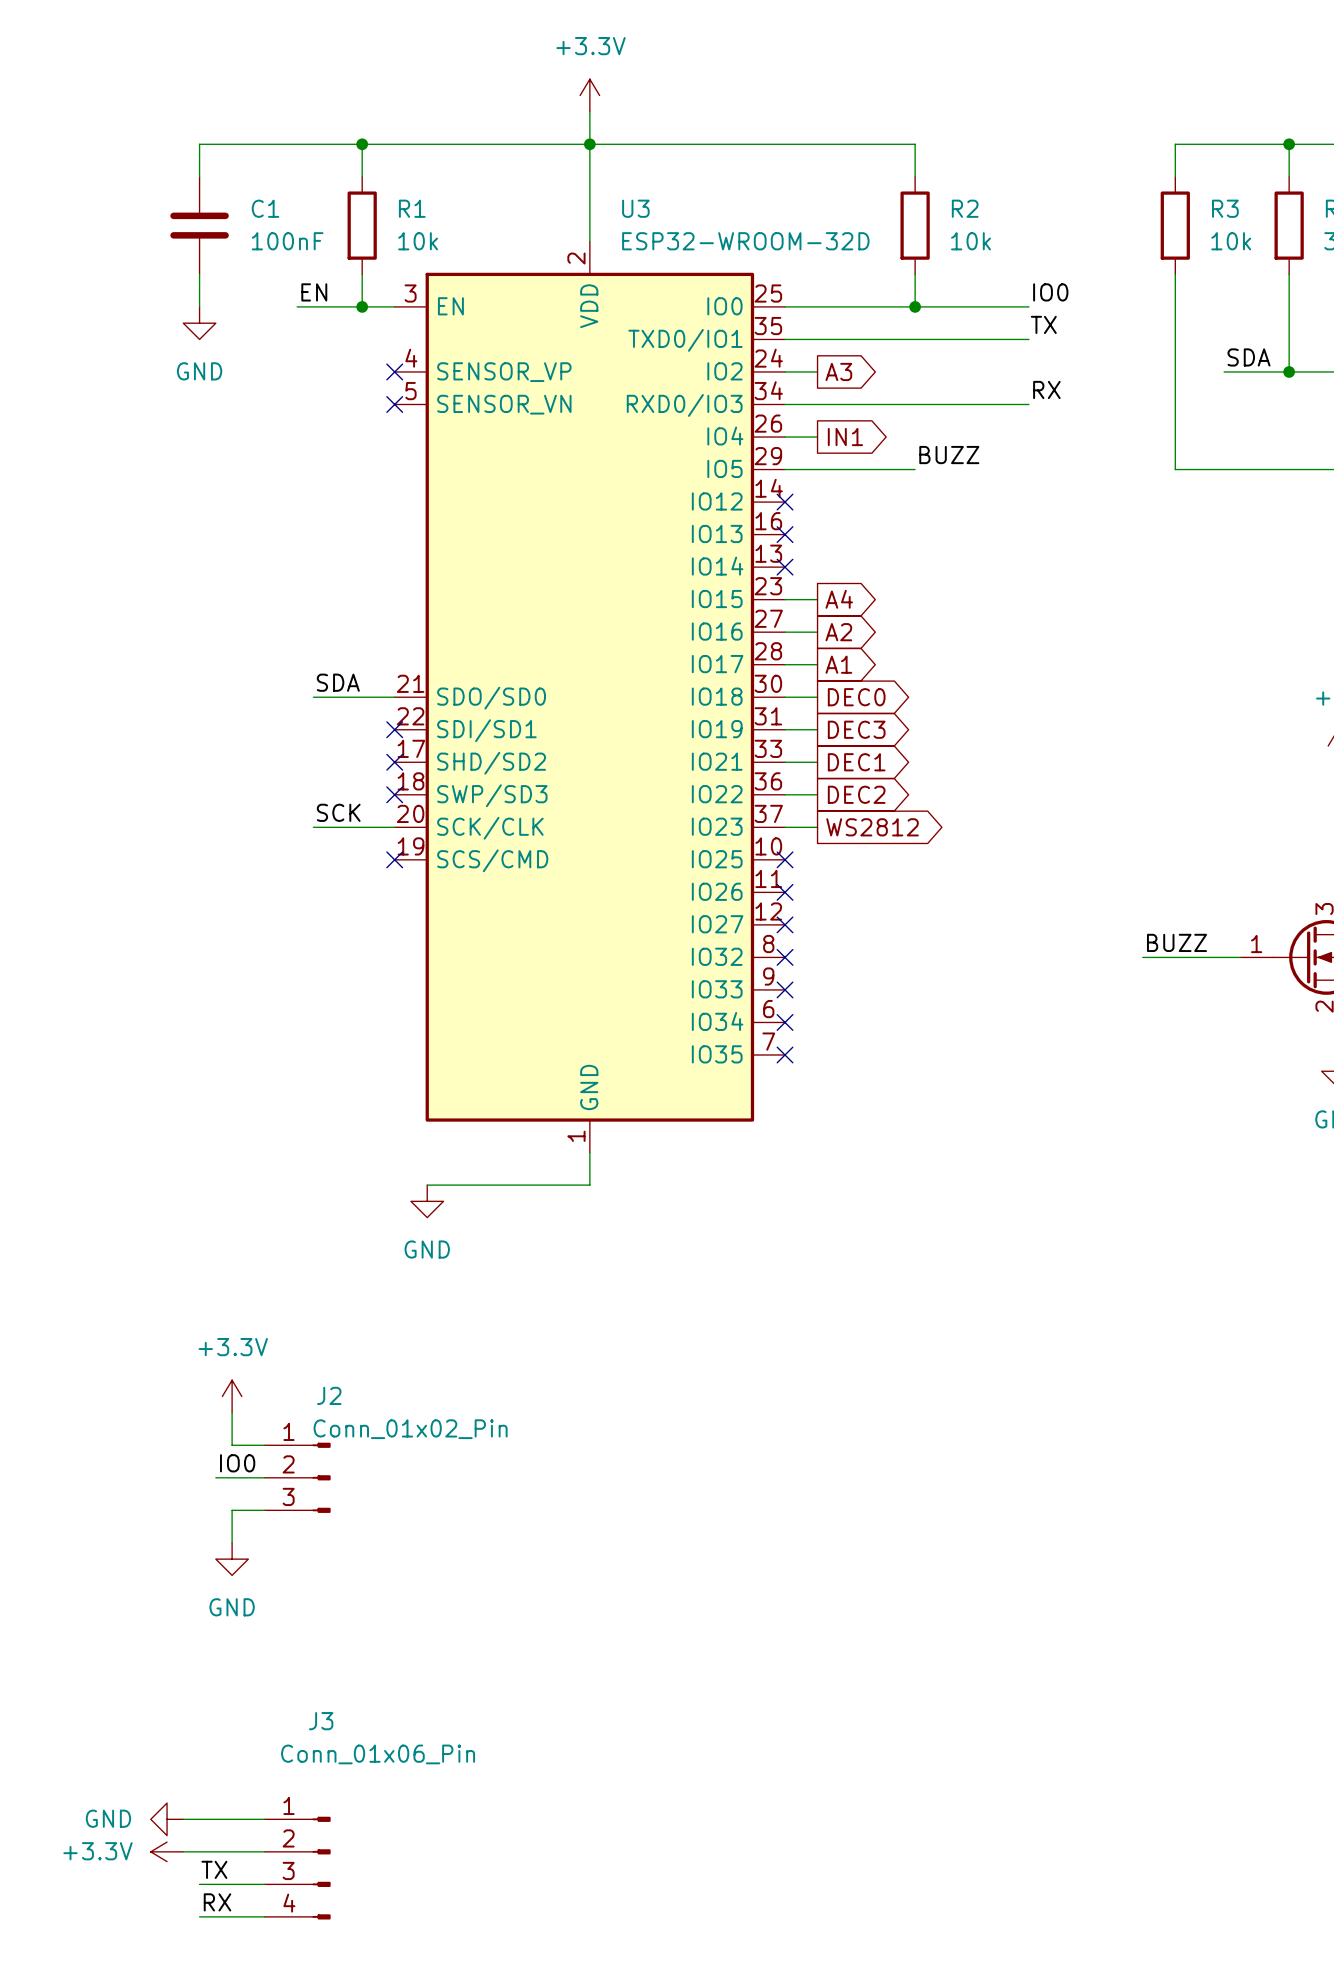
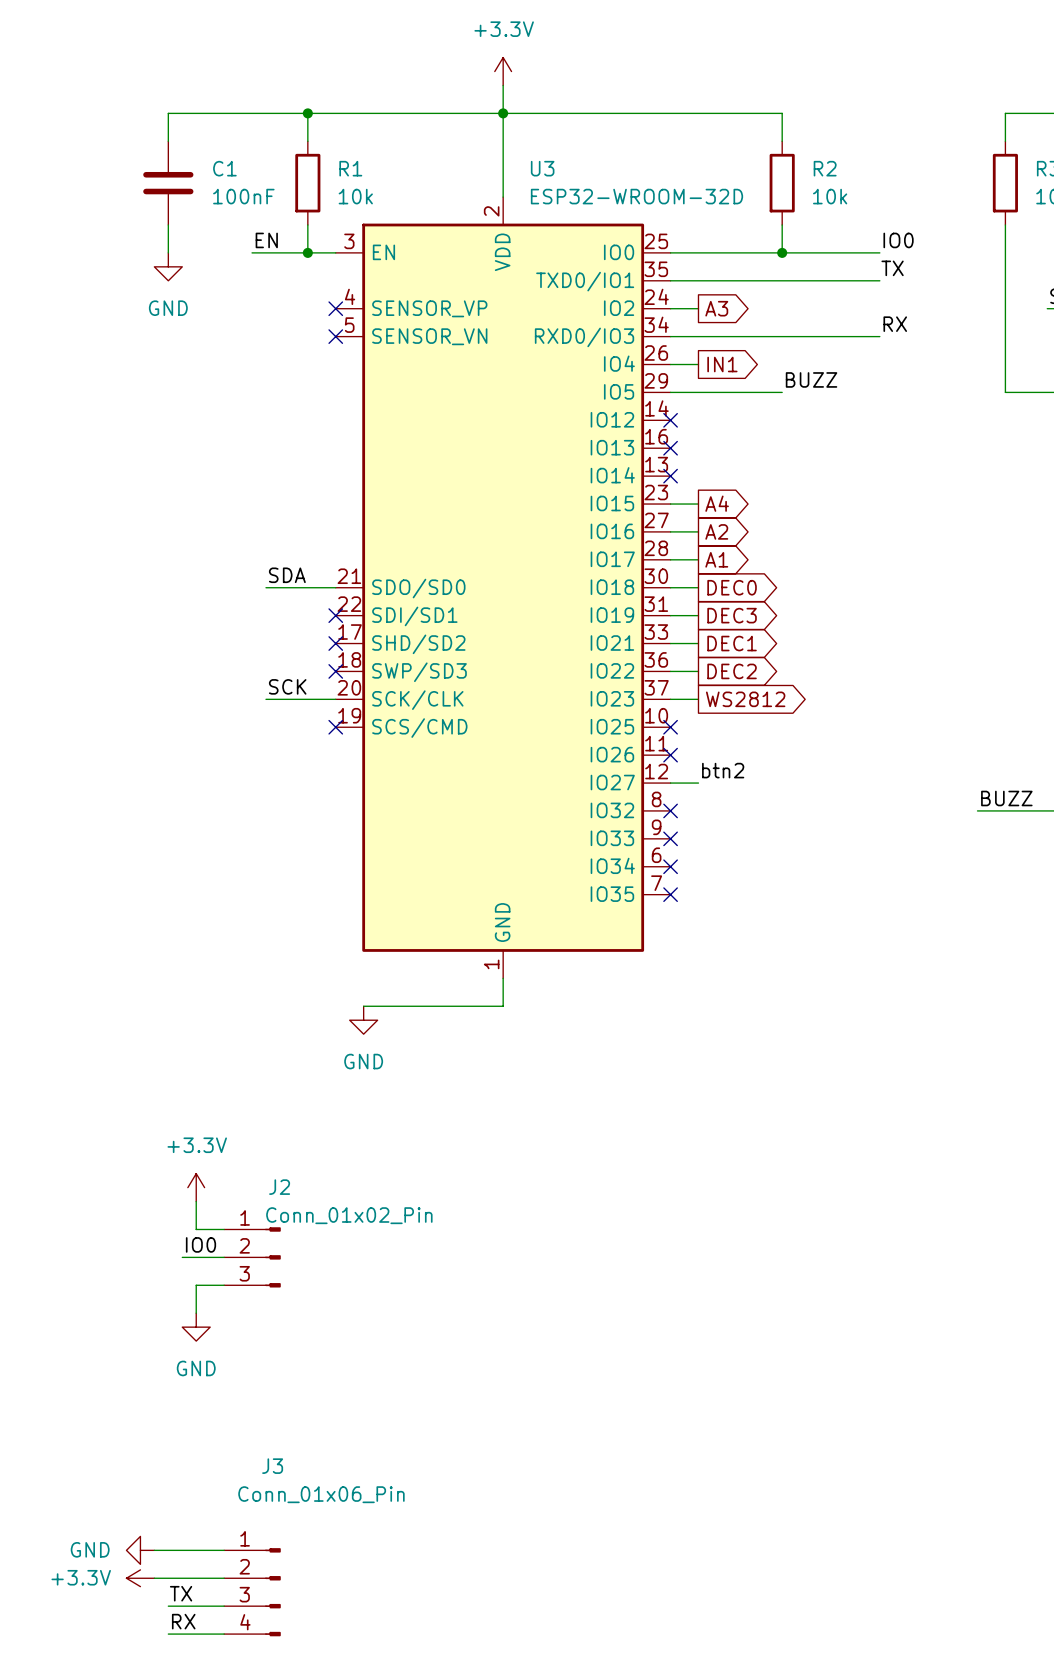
label: none -> btn2 (723, 770)
wire: none -> (670, 783) (698, 783)
no-connect mark: (785, 924) -> none

